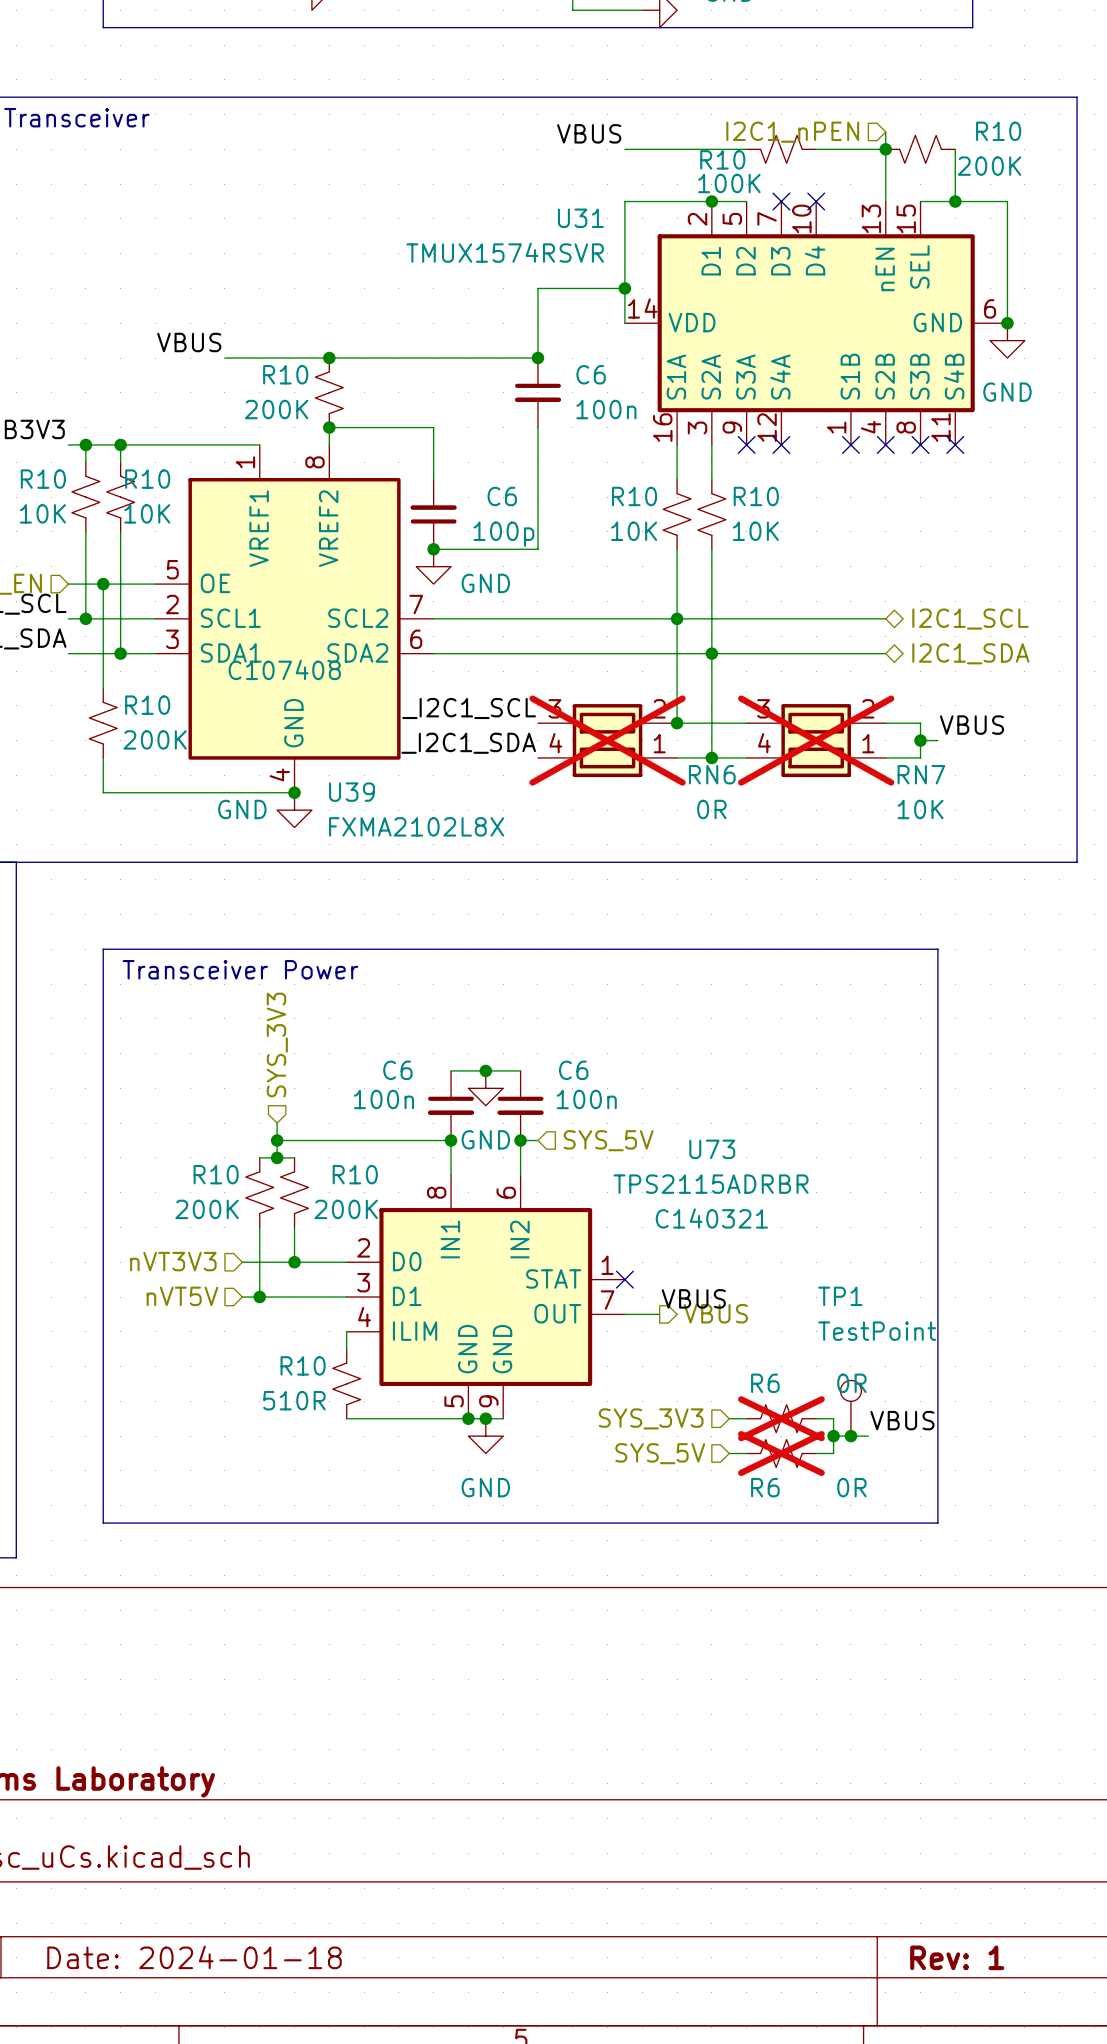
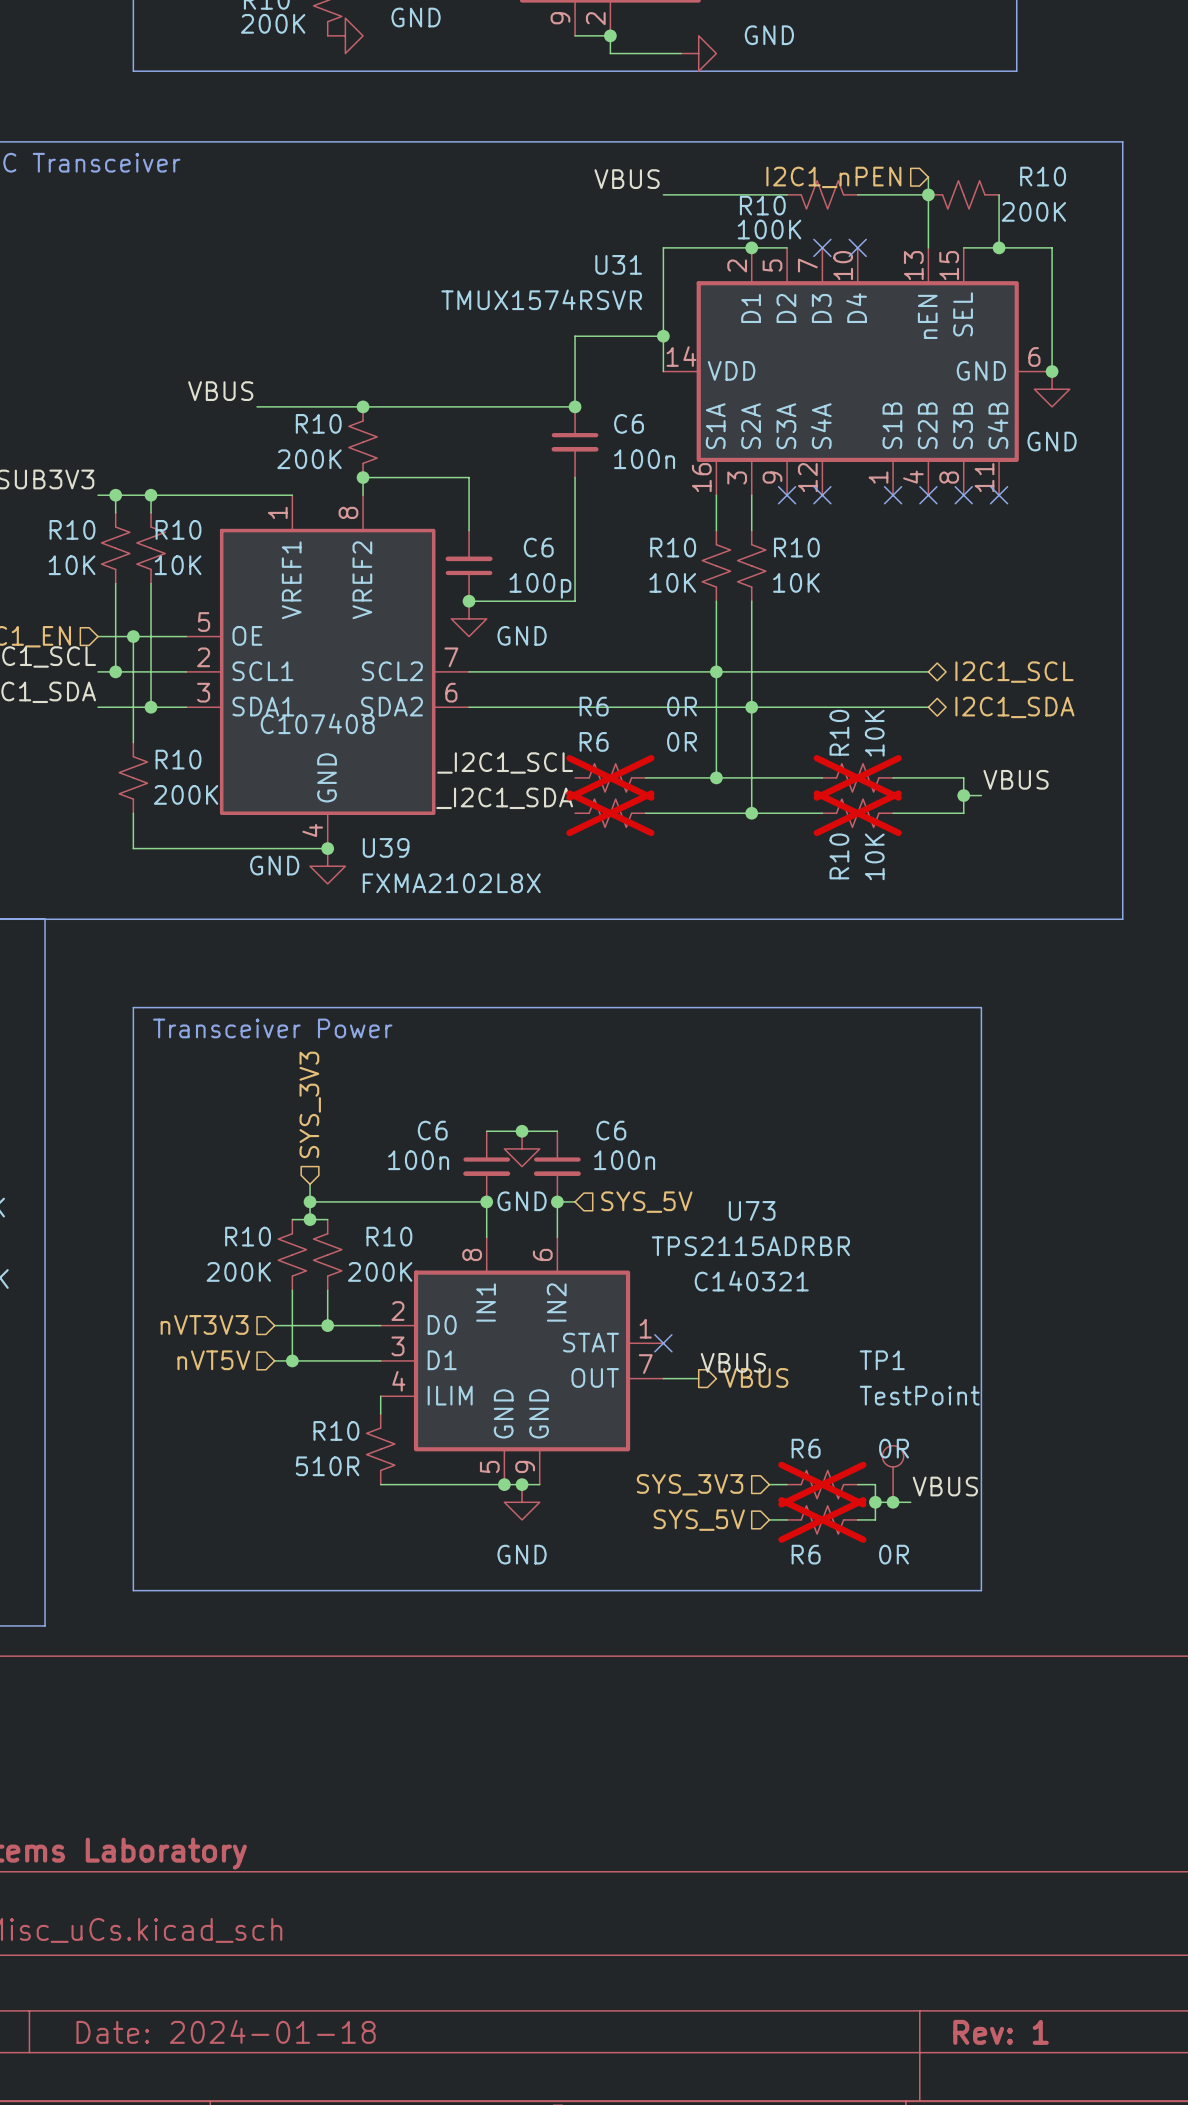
R6: none -> 0R (610, 777)
R10: none -> 10K (857, 777)
RN6: 0R (607, 740) -> none
RN7: 10K (816, 740) -> none
R6: none -> 0R (610, 813)
R10: none -> 10K (857, 813)

